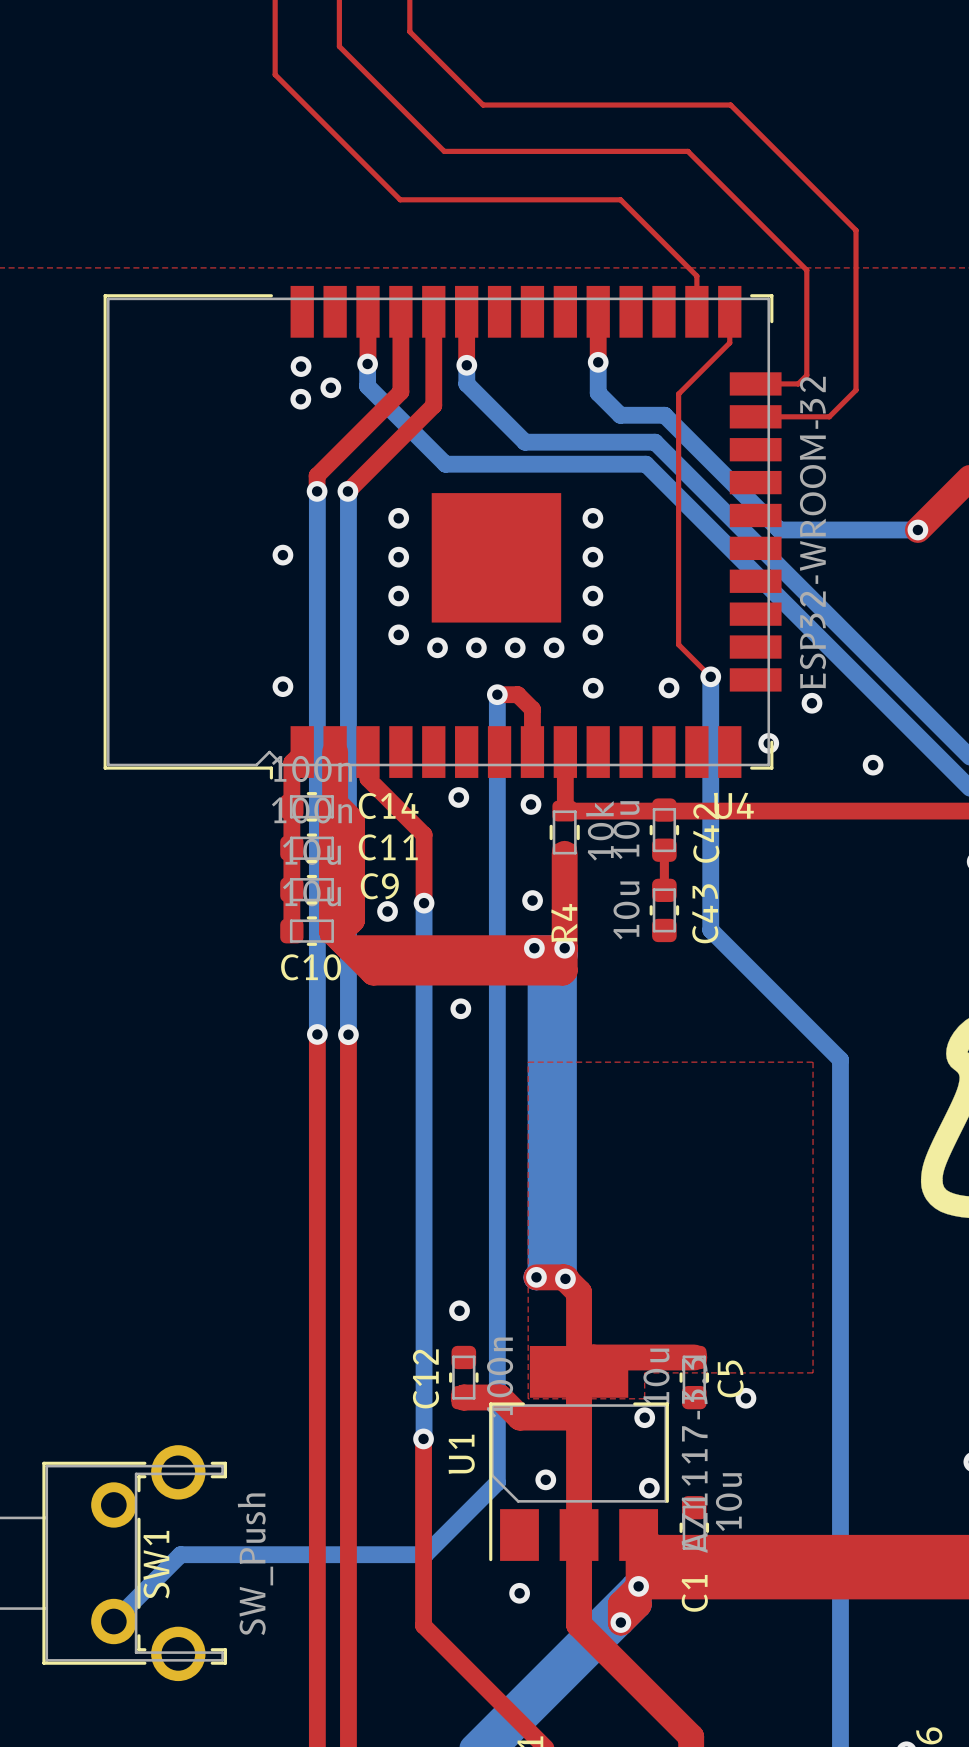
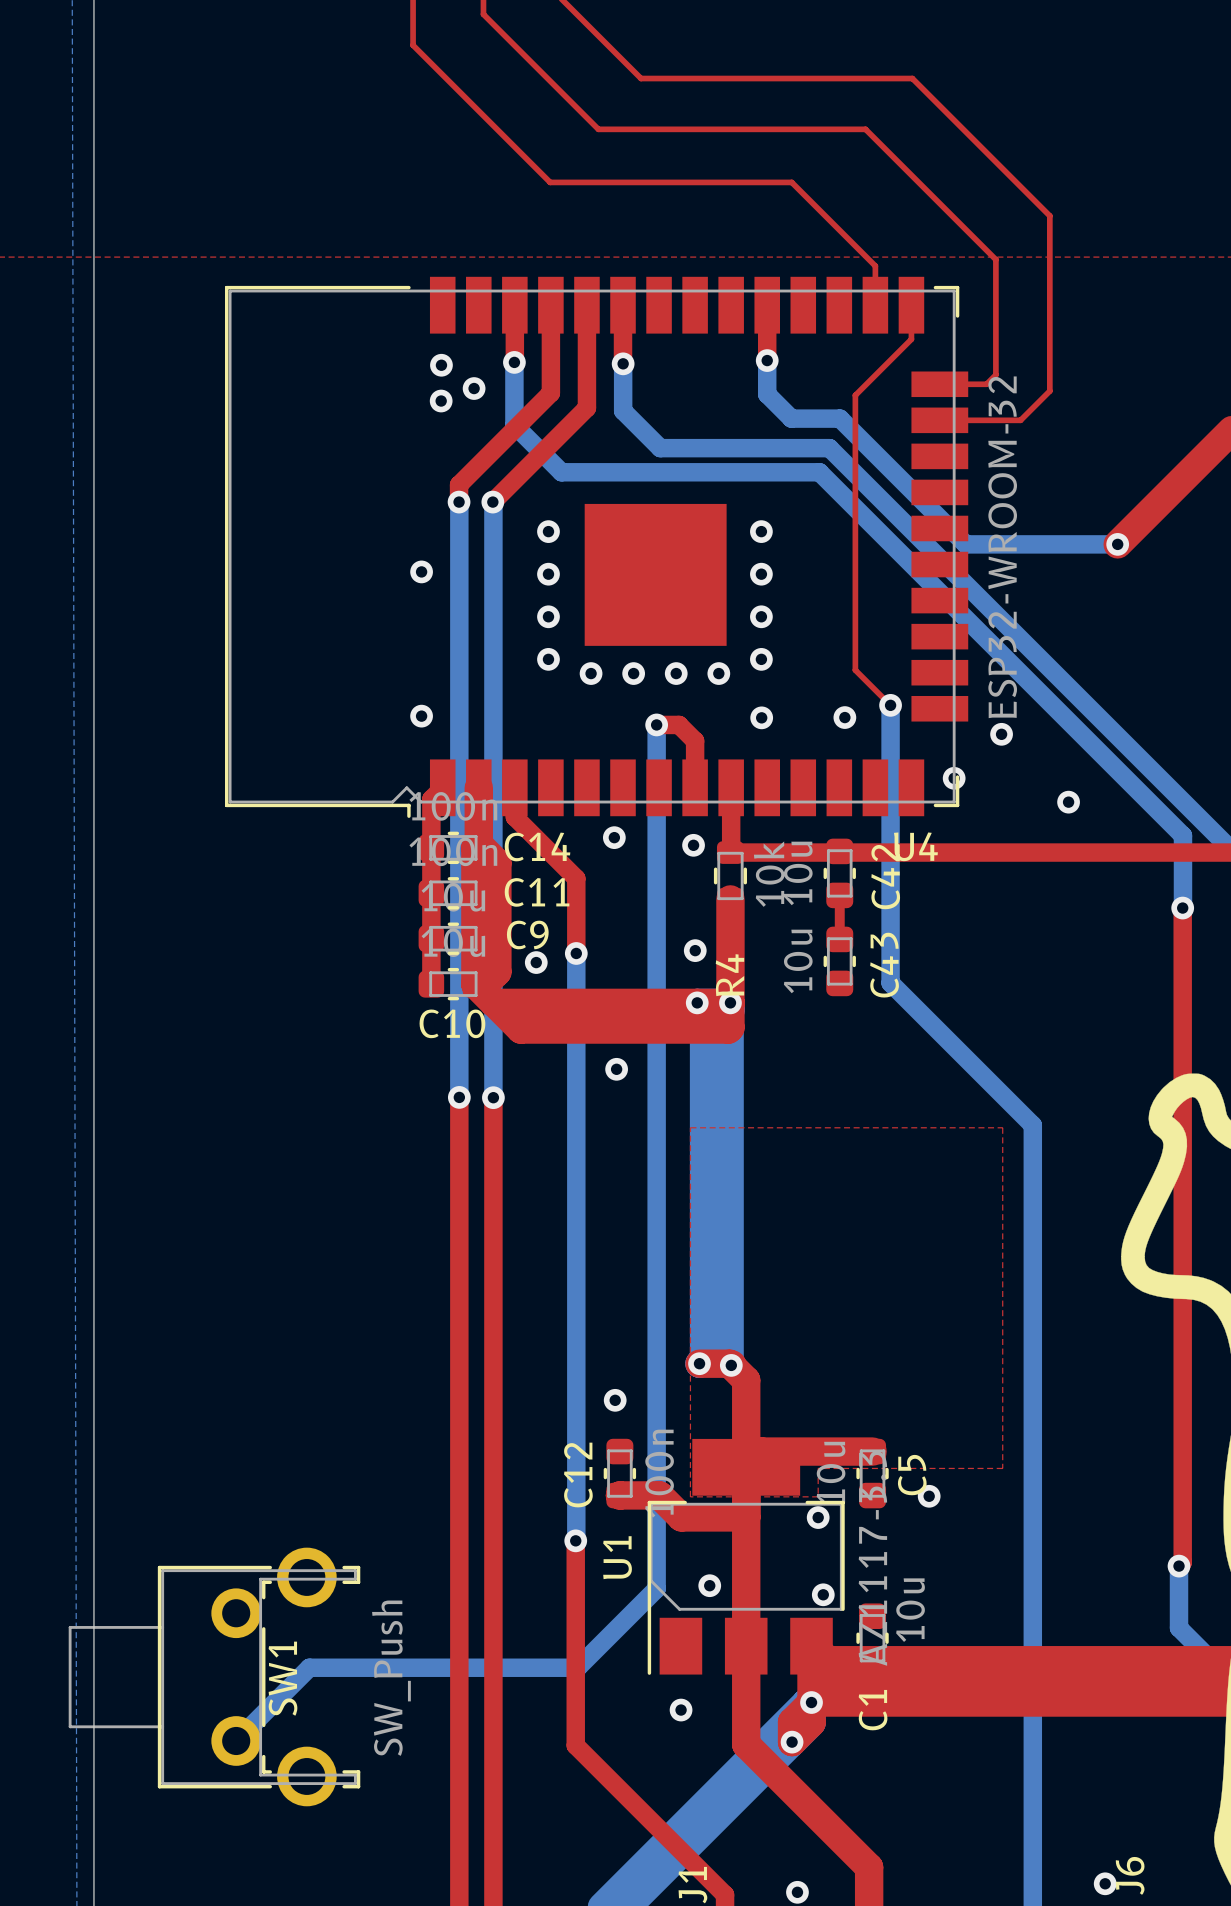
bottom track: (466, 383) (525, 442) -> (623, 384) (623, 410) (660, 448) (687, 448)
bottom track: (367, 386) (445, 464) -> (514, 386) (514, 425) (561, 472) (599, 472)

